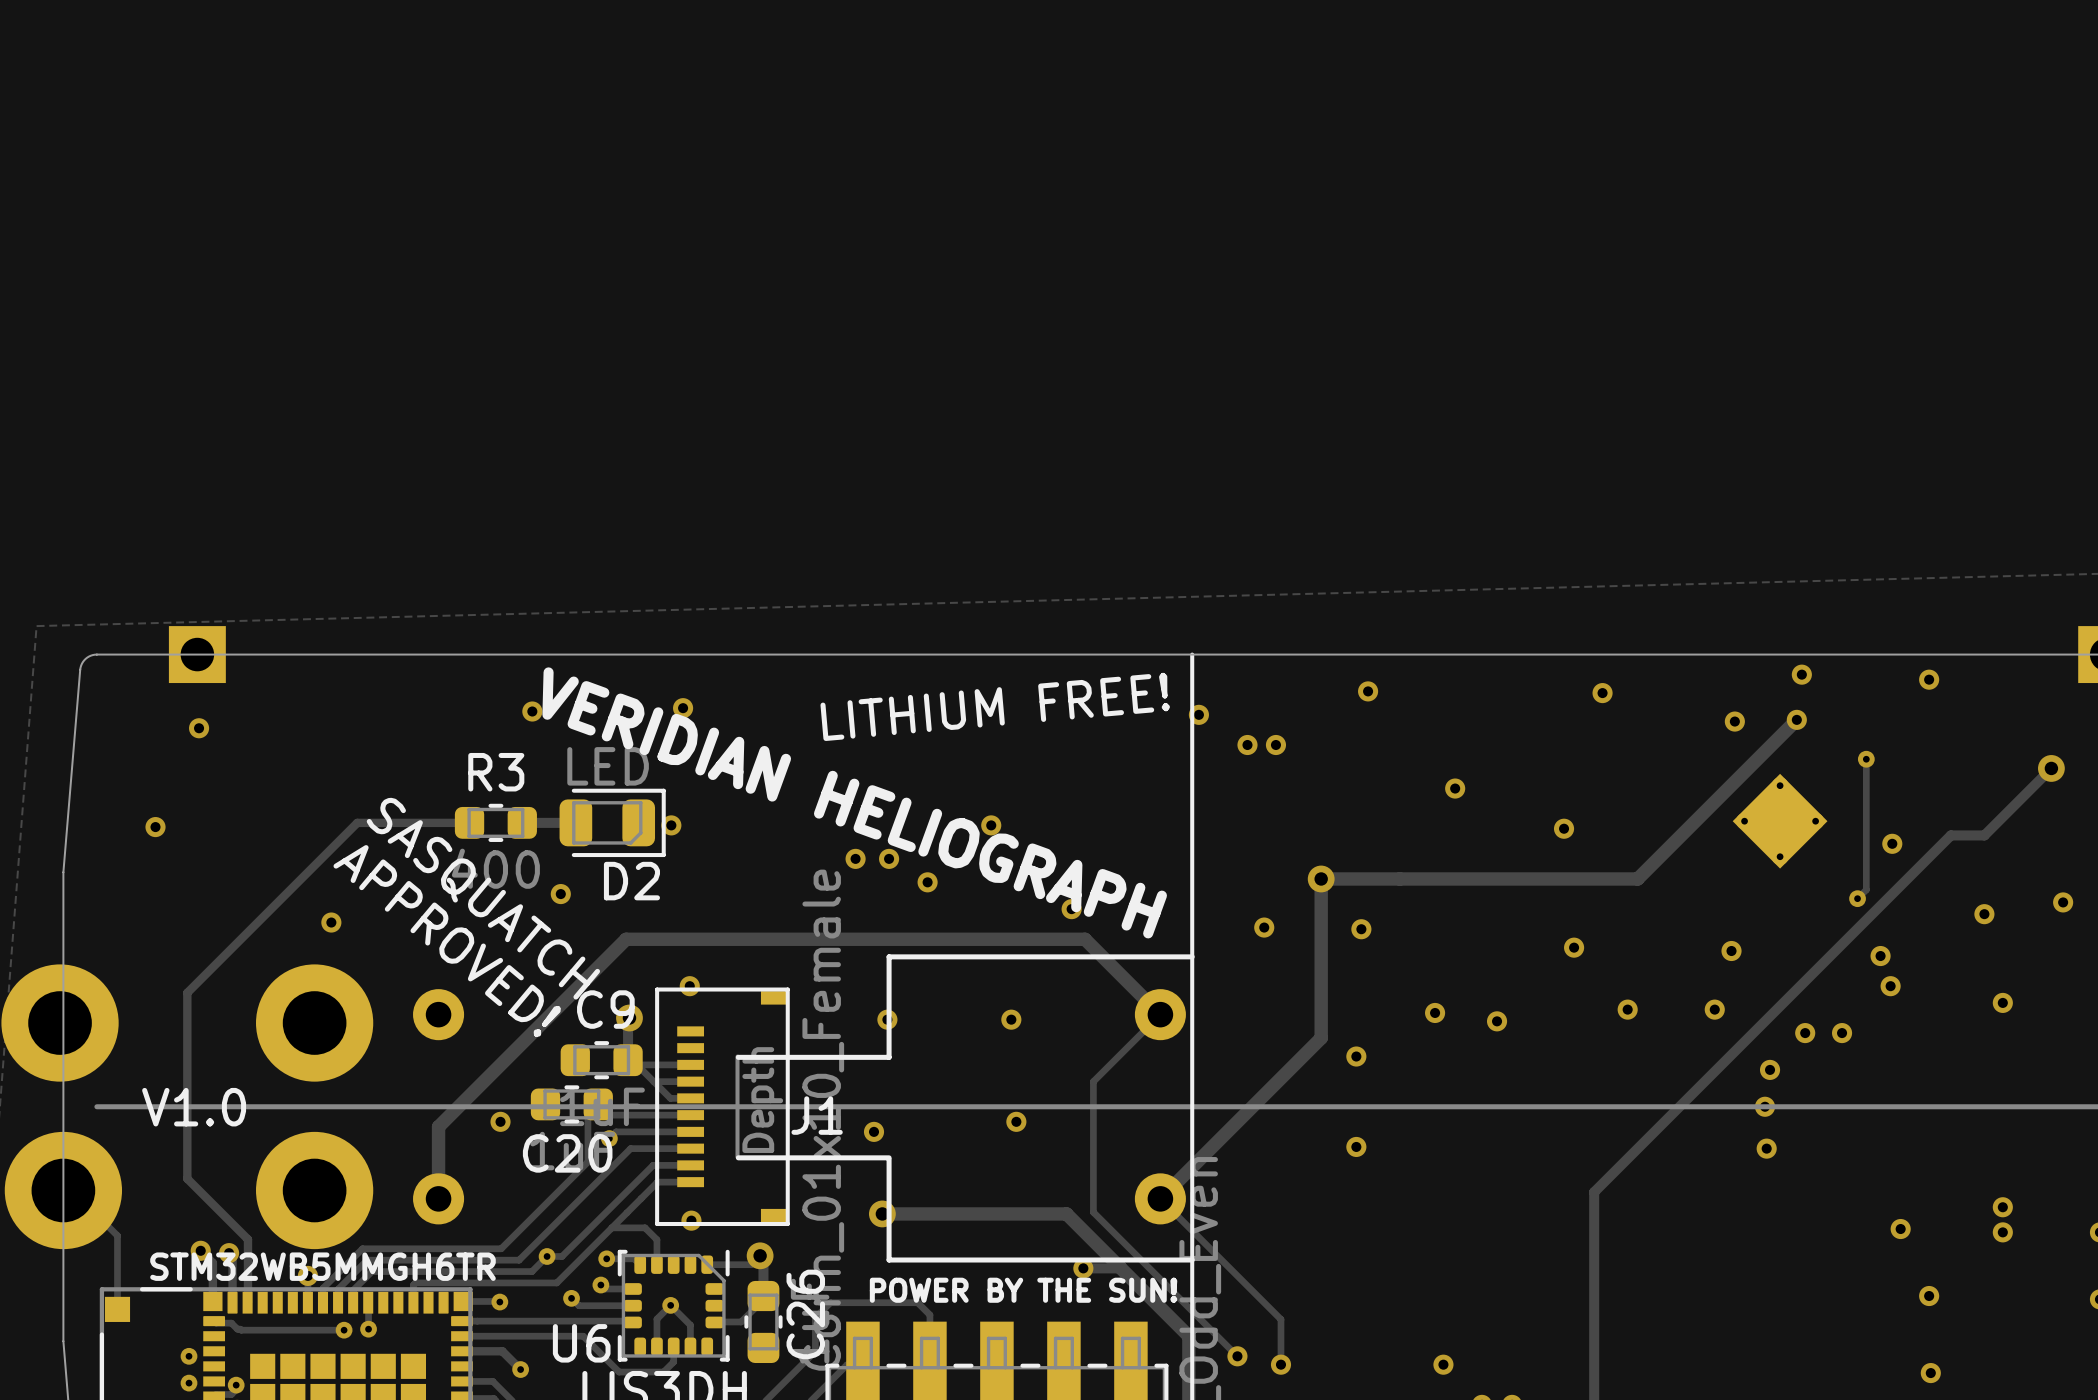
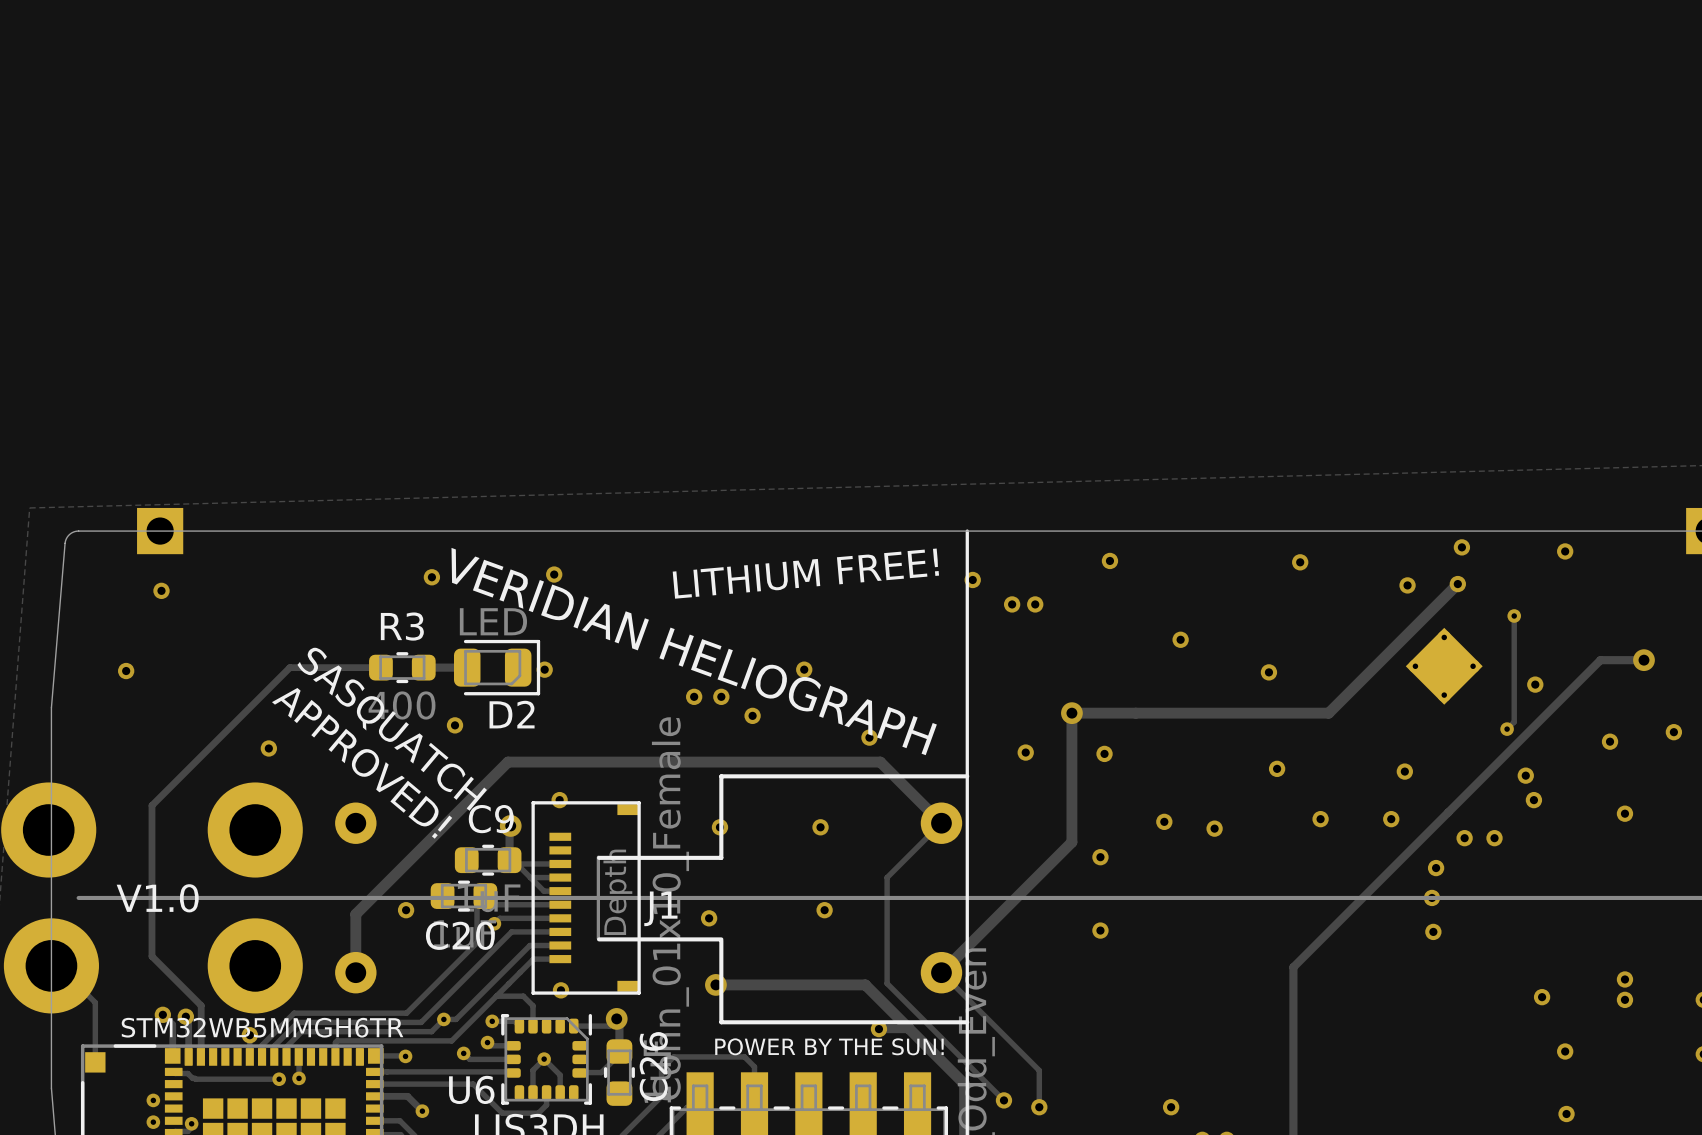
track: (2051, 768) (1984, 835) (1950, 835) -> (1643, 660) (1600, 660) (1582, 677)
via position: (2051, 768) -> (1643, 660)

